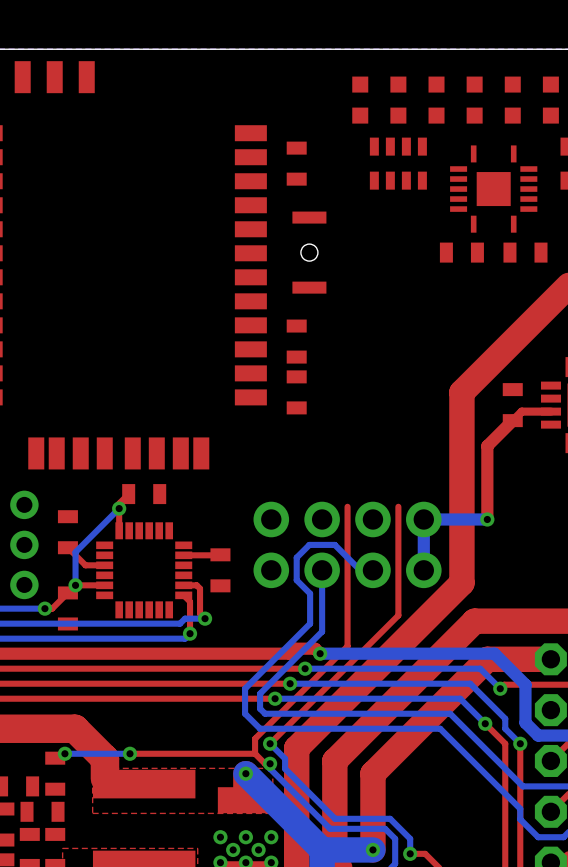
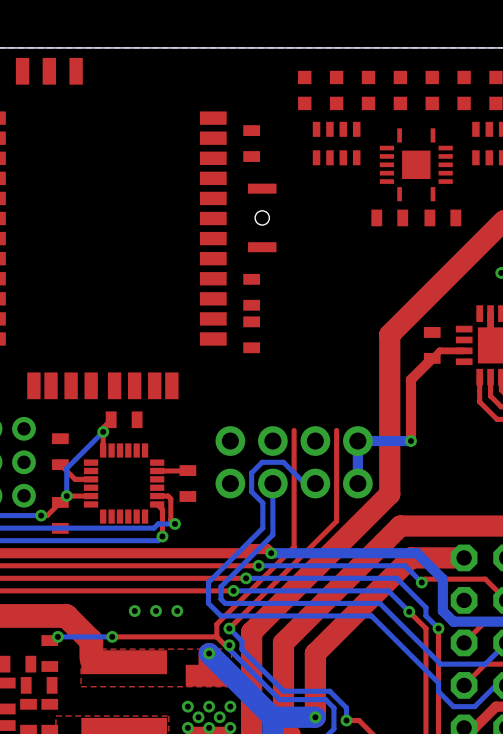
via: none -> (134, 611)
via: none -> (156, 611)
via: none -> (177, 611)

